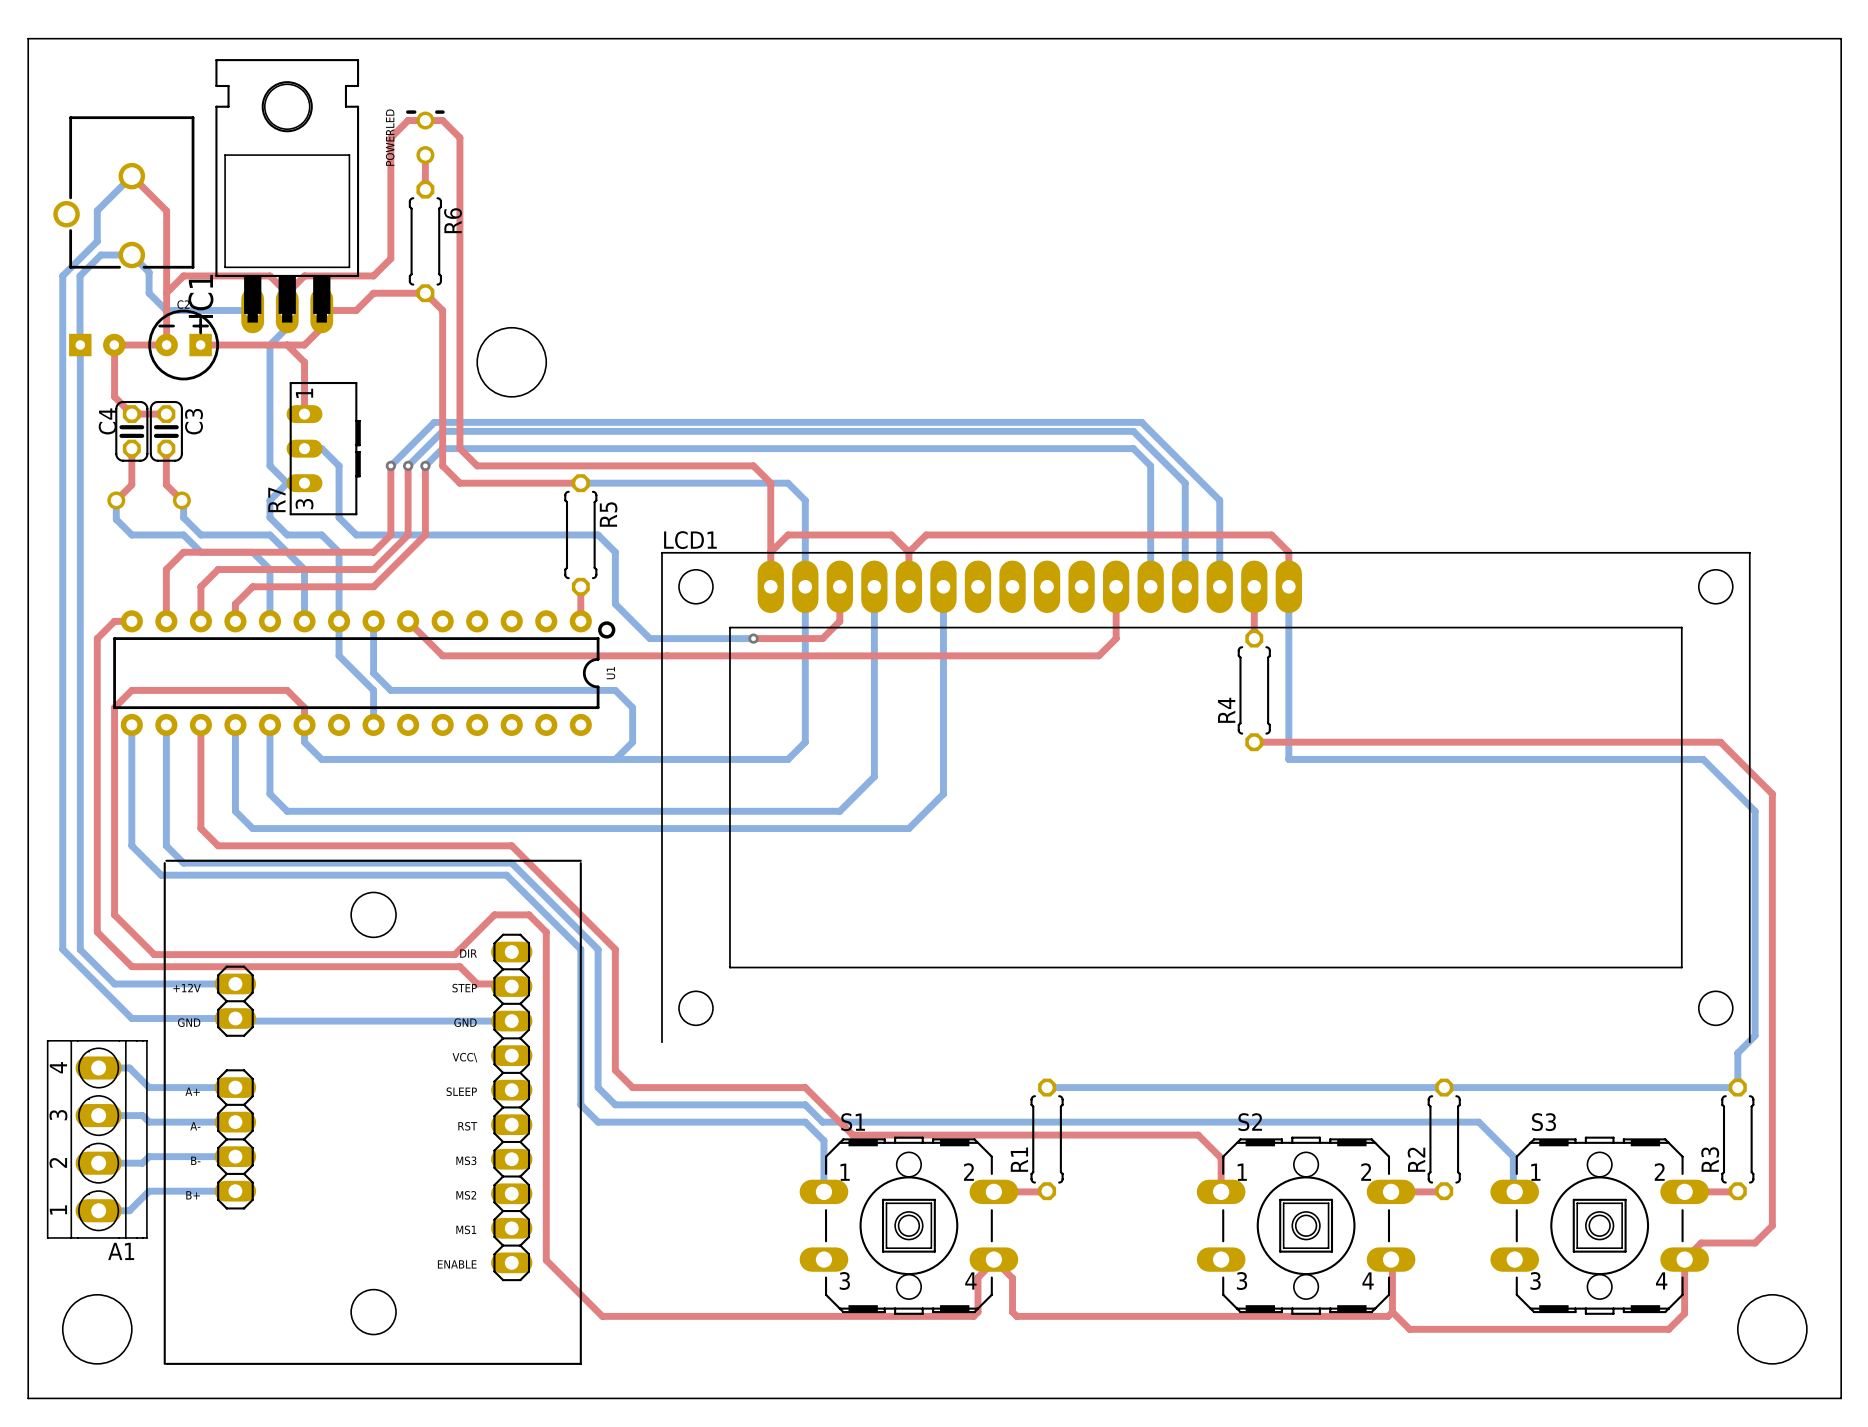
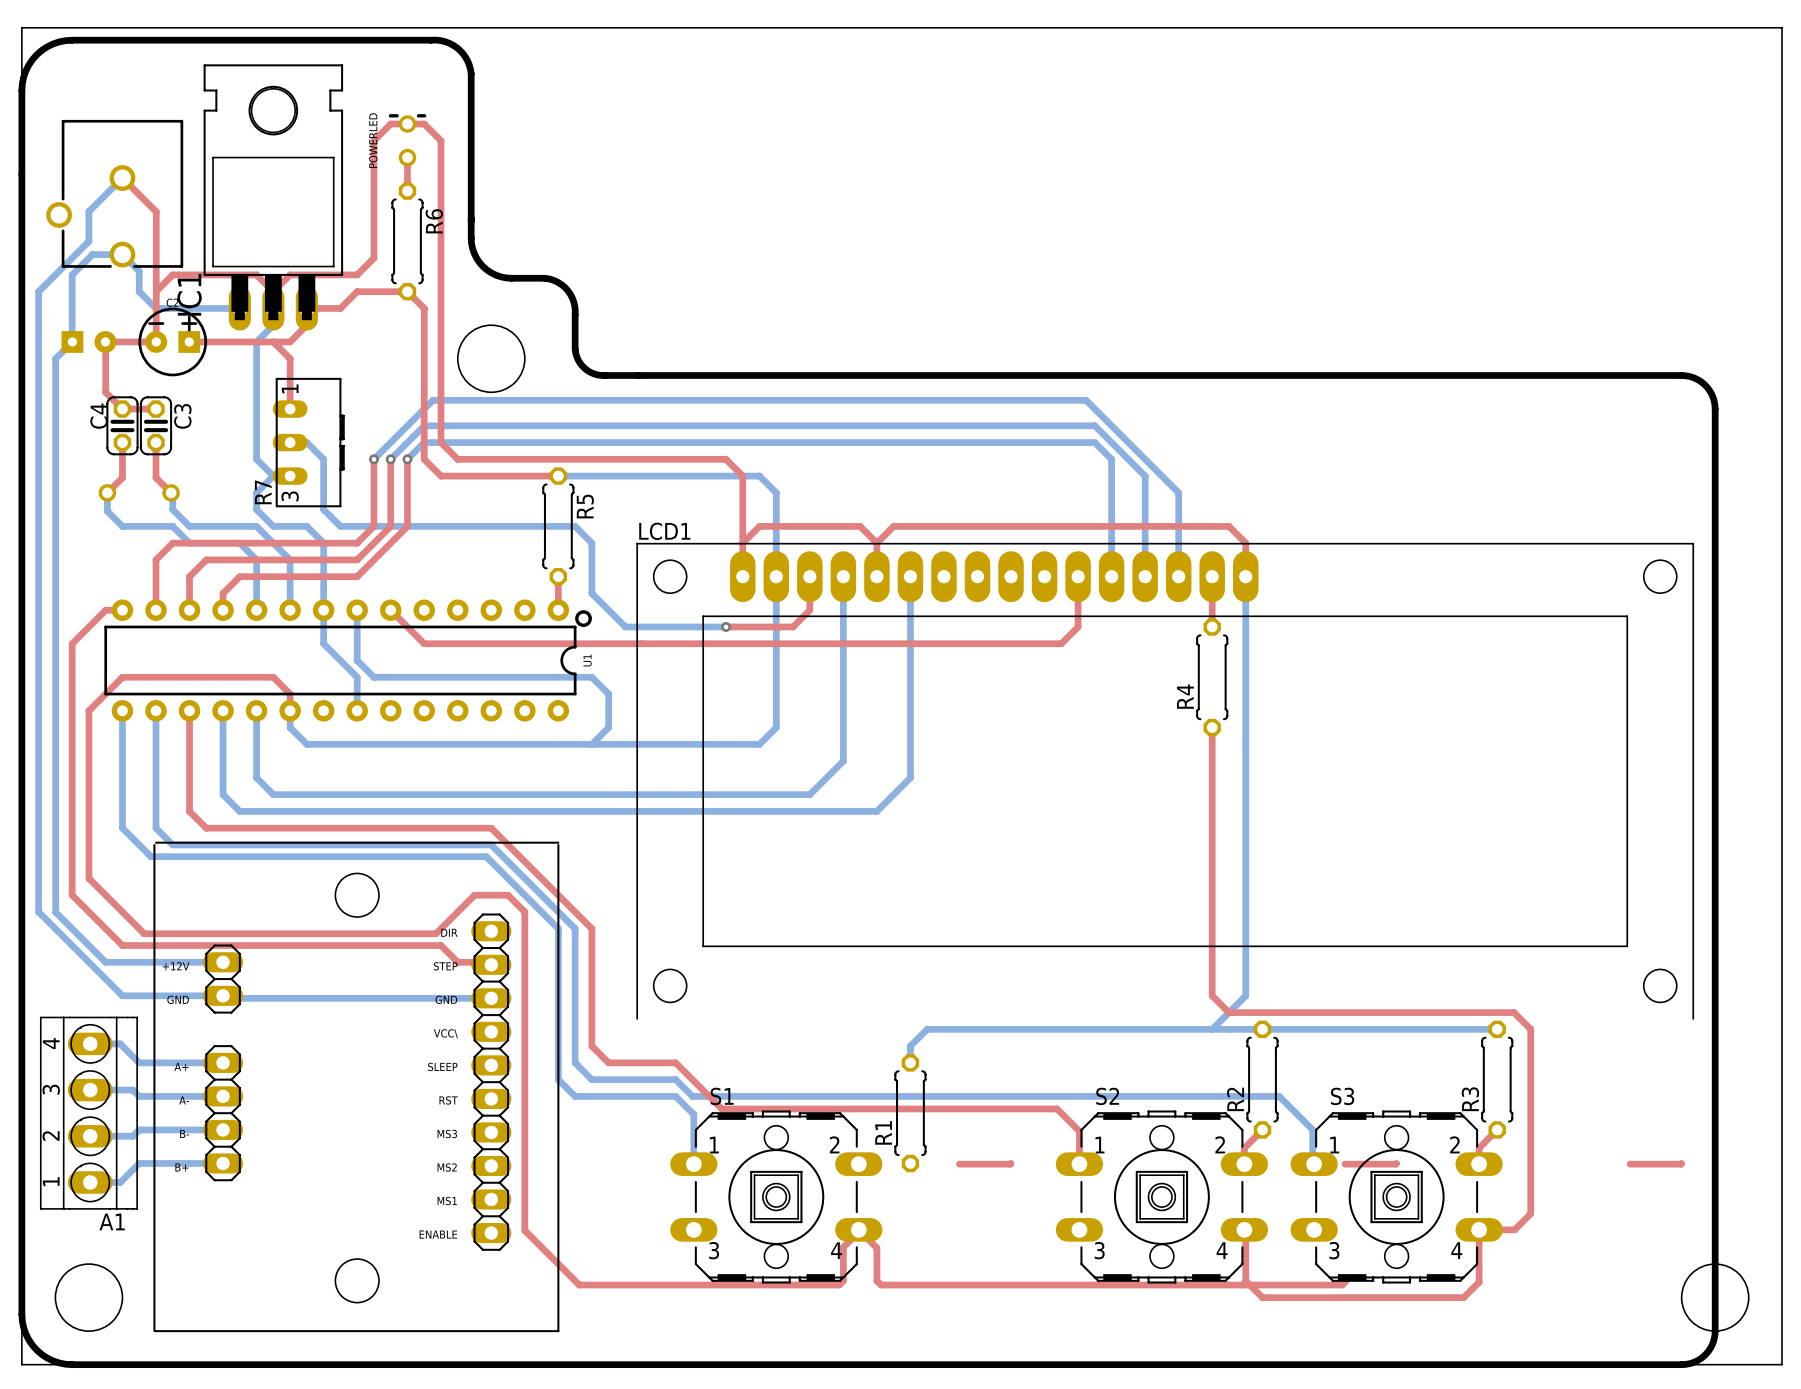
board edge: none -> (72, 40) (435, 40) (454, 45) (464, 55) (471, 73) (471, 238) (474, 253) (482, 266) (496, 275) (506, 277) (549, 278) (564, 287) (572, 297) (574, 306) (576, 356) (584, 368) (597, 374) (1681, 375) (1690, 376) (1702, 382) (1712, 396) (1715, 409) (1715, 1331) (1714, 1339) (1708, 1351) (1694, 1362) (1681, 1364) (72, 1364) (59, 1362) (41, 1354) (28, 1339) (23, 1327) (21, 1314) (21, 90) (25, 71) (36, 54) (52, 44) (72, 40)
board edge: (28, 38) (1841, 38) -> (21, 44) (21, 27) (1781, 27) (1781, 44)
bottom track: (62, 275) (62, 949) -> (55, 274) (38, 291) (38, 911) (55, 928)
bottom track: (80, 345) (80, 949) -> (72, 341) (55, 358) (55, 912) (72, 929)
bottom track: (434, 422) (1141, 422) -> (416, 417) (432, 400) (1086, 400) (1102, 417)
top track: (97, 638) (97, 724) -> (105, 694) (88, 710)
top track: none -> (88, 626) (72, 643) (72, 895) (88, 911)
top track: (114, 707) (114, 914) -> none
top track: (1254, 742) (1720, 742) (1772, 794) (1772, 1225) (1755, 1243) (1701, 1243) (1684, 1259) (1684, 1313) (1668, 1329) (1513, 1329) -> (1212, 727) (1212, 995) (1228, 1012) (1513, 1012) (1530, 1029) (1530, 1213) (1514, 1229) (1479, 1229) (1479, 1282) (1463, 1297)
bottom track: (1288, 759) (1703, 759) (1755, 811) (1755, 1035) (1737, 1053) (1737, 1087) (1047, 1087) -> (1245, 744) (1245, 995) (1212, 1029)
top track: (97, 897) (97, 932) -> (88, 878) (105, 895)
bottom track: none -> (1497, 1029) (927, 1029) (910, 1046) (910, 1062)
top track: (701, 1087) (805, 1087) (852, 1135) -> (675, 1062) (721, 1108) (822, 1108)
bottom track: (701, 1104) (805, 1104) (822, 1122) -> none
bottom track: (701, 1122) (718, 1122) -> (675, 1079) (692, 1096)
bottom track: none -> (675, 1096) (693, 1114) (693, 1164)
bottom track: (805, 1122) (823, 1140) (823, 1191) -> (776, 1096) (793, 1096)
bottom track: (1323, 1122) (1478, 1122) (1513, 1156) (1514, 1191) -> (1279, 1096) (1312, 1129) (1314, 1164)
top track: (1094, 1135) (1198, 1135) (1221, 1158) (1221, 1191) -> (1057, 1108) (1079, 1131) (1079, 1164)
R1 position: (1047, 1139) -> (910, 1113)
R2 position: (1444, 1139) -> (1262, 1079)
R3 position: (1737, 1139) -> (1497, 1079)
top track: none -> (1262, 1129) (1244, 1148) (1244, 1164)
top track: none -> (1497, 1129) (1479, 1148) (1479, 1164)
S1 position: (908, 1225) -> (776, 1197)
S2 position: (1306, 1225) -> (1161, 1197)
S3 position: (1599, 1225) -> (1396, 1197)
top track: (993, 1259) (1012, 1278) (1012, 1312) (1016, 1316) -> (858, 1229) (876, 1247) (876, 1280) (881, 1285)
top track: (1391, 1259) (1392, 1312) (1409, 1329) -> (1244, 1229) (1245, 1280) (1262, 1297) (1363, 1297)
top track: (994, 1260) (978, 1277) (978, 1312) (973, 1316) -> (981, 1285) (939, 1285)
top track: (870, 1316) (913, 1316) -> (839, 1285) (843, 1280) (843, 1247) (859, 1230)

